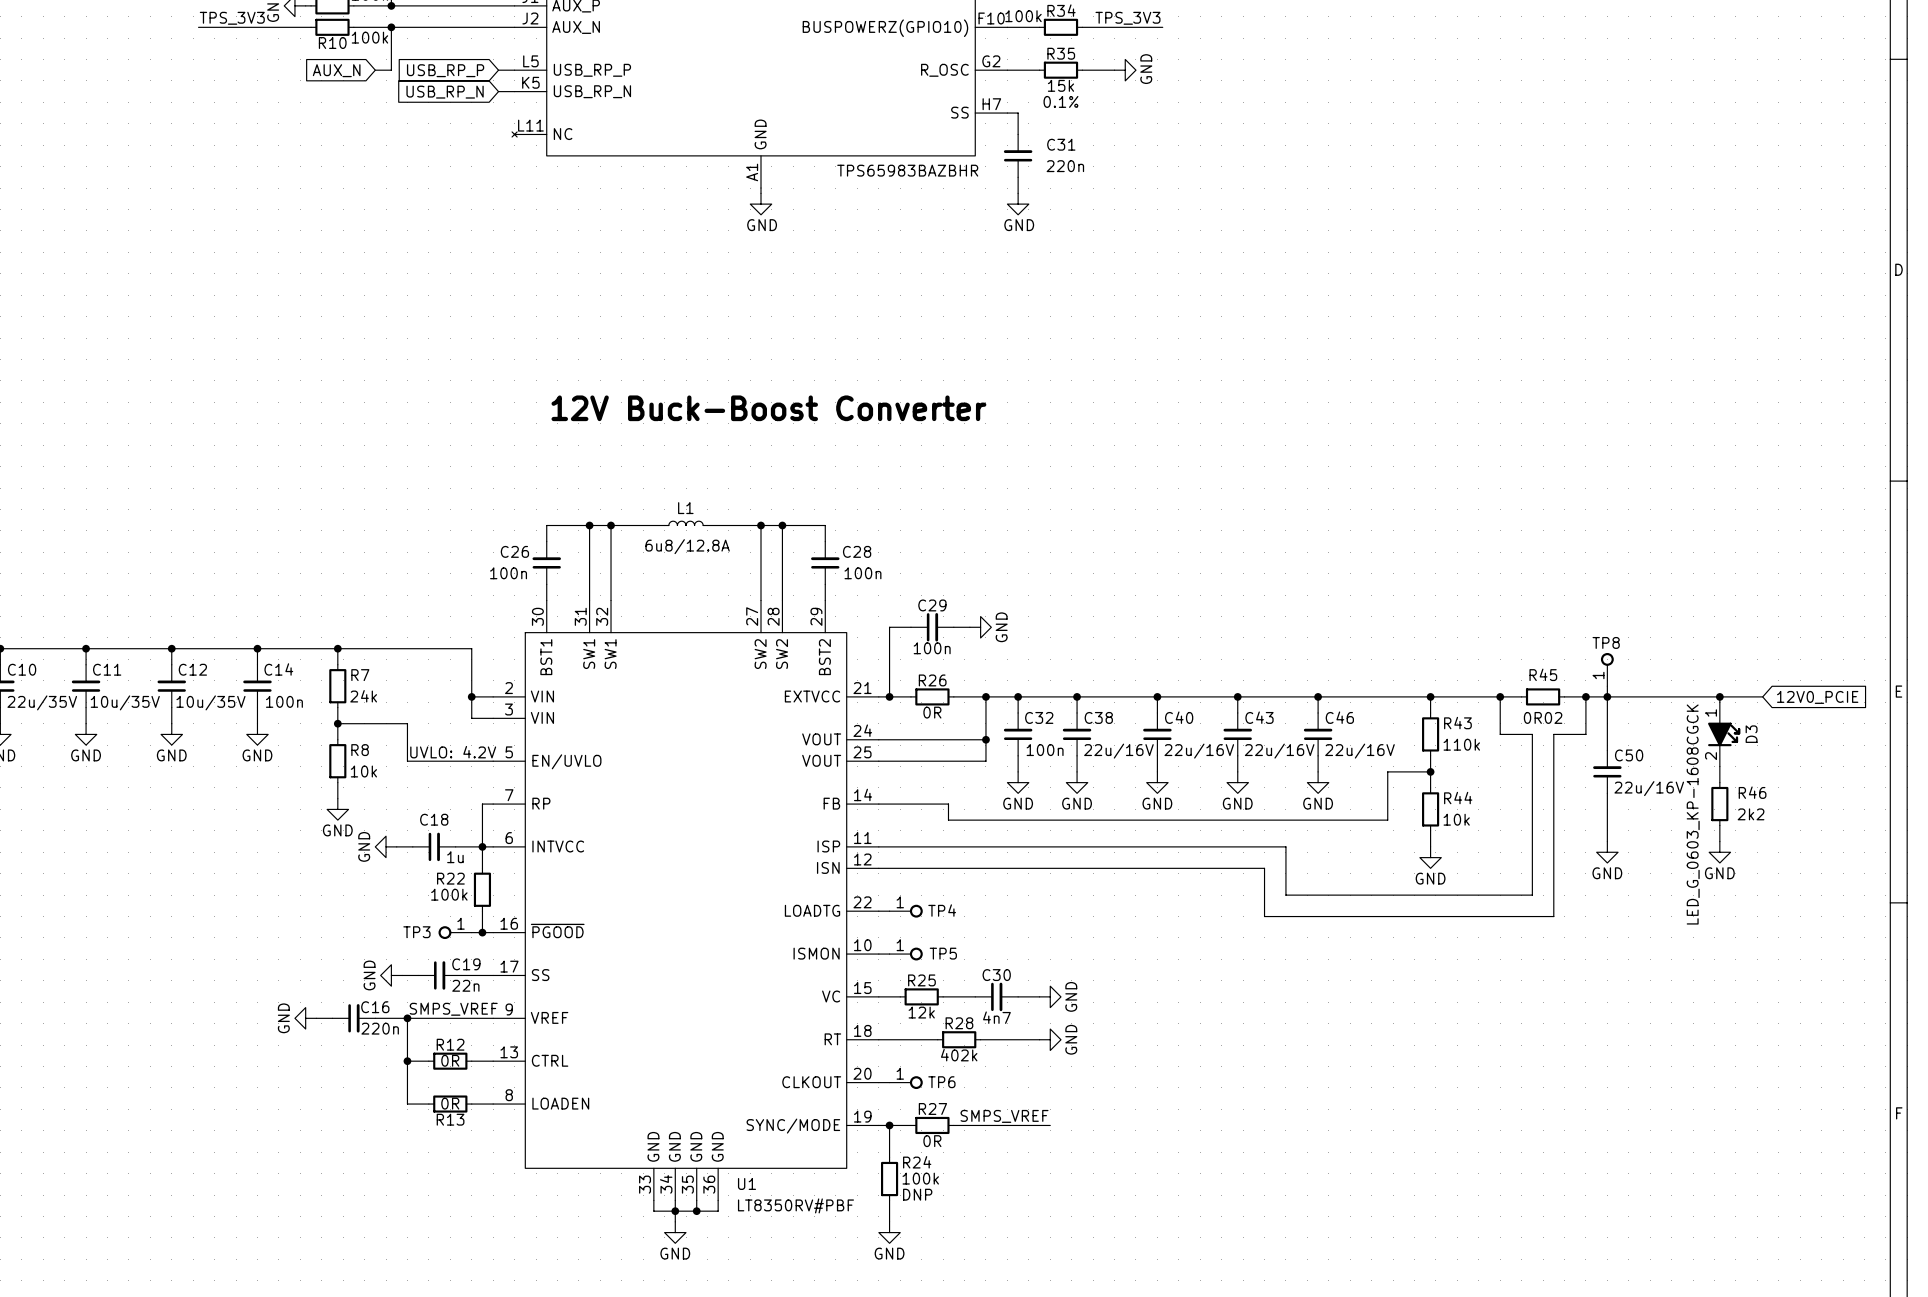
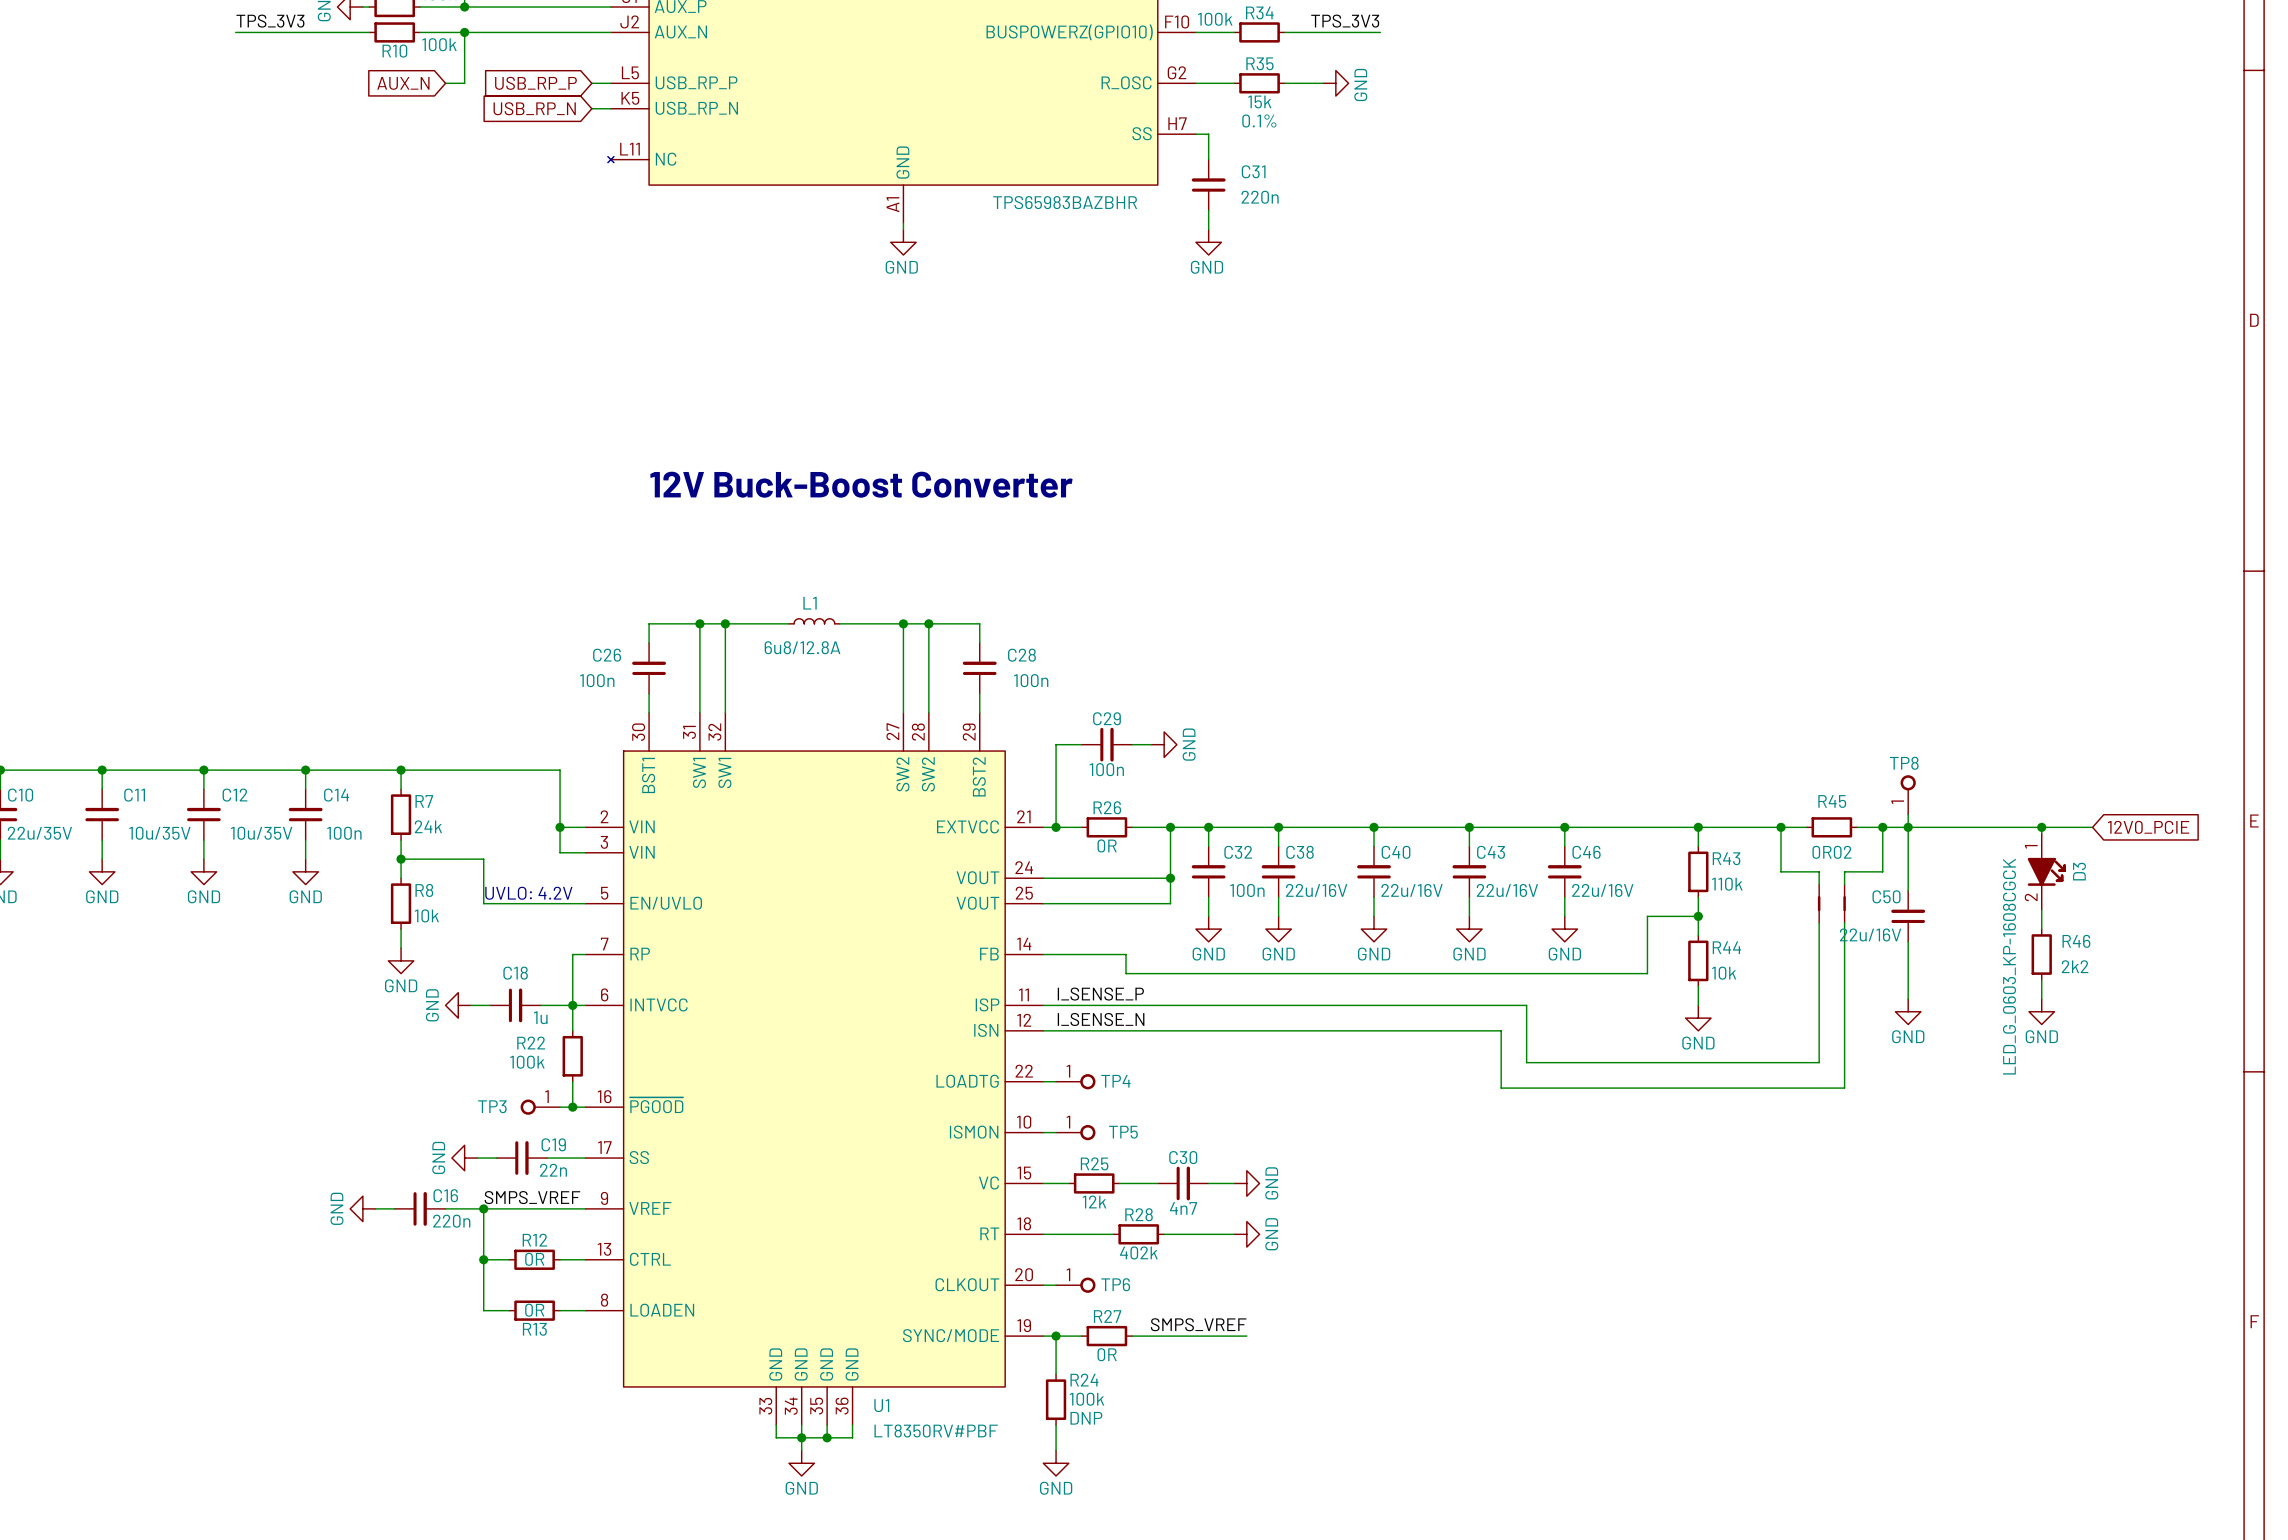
C50 name position: C50 (1629, 755) -> C50 (1886, 896)
part: none -> (1819, 903)
part: none -> (1844, 903)
C50 text position: 22u/16V (1649, 788) -> 22u/16V (1870, 934)
label: none -> I_SENSE_P (1100, 994)
label: none -> I_SENSE_N (1101, 1019)

